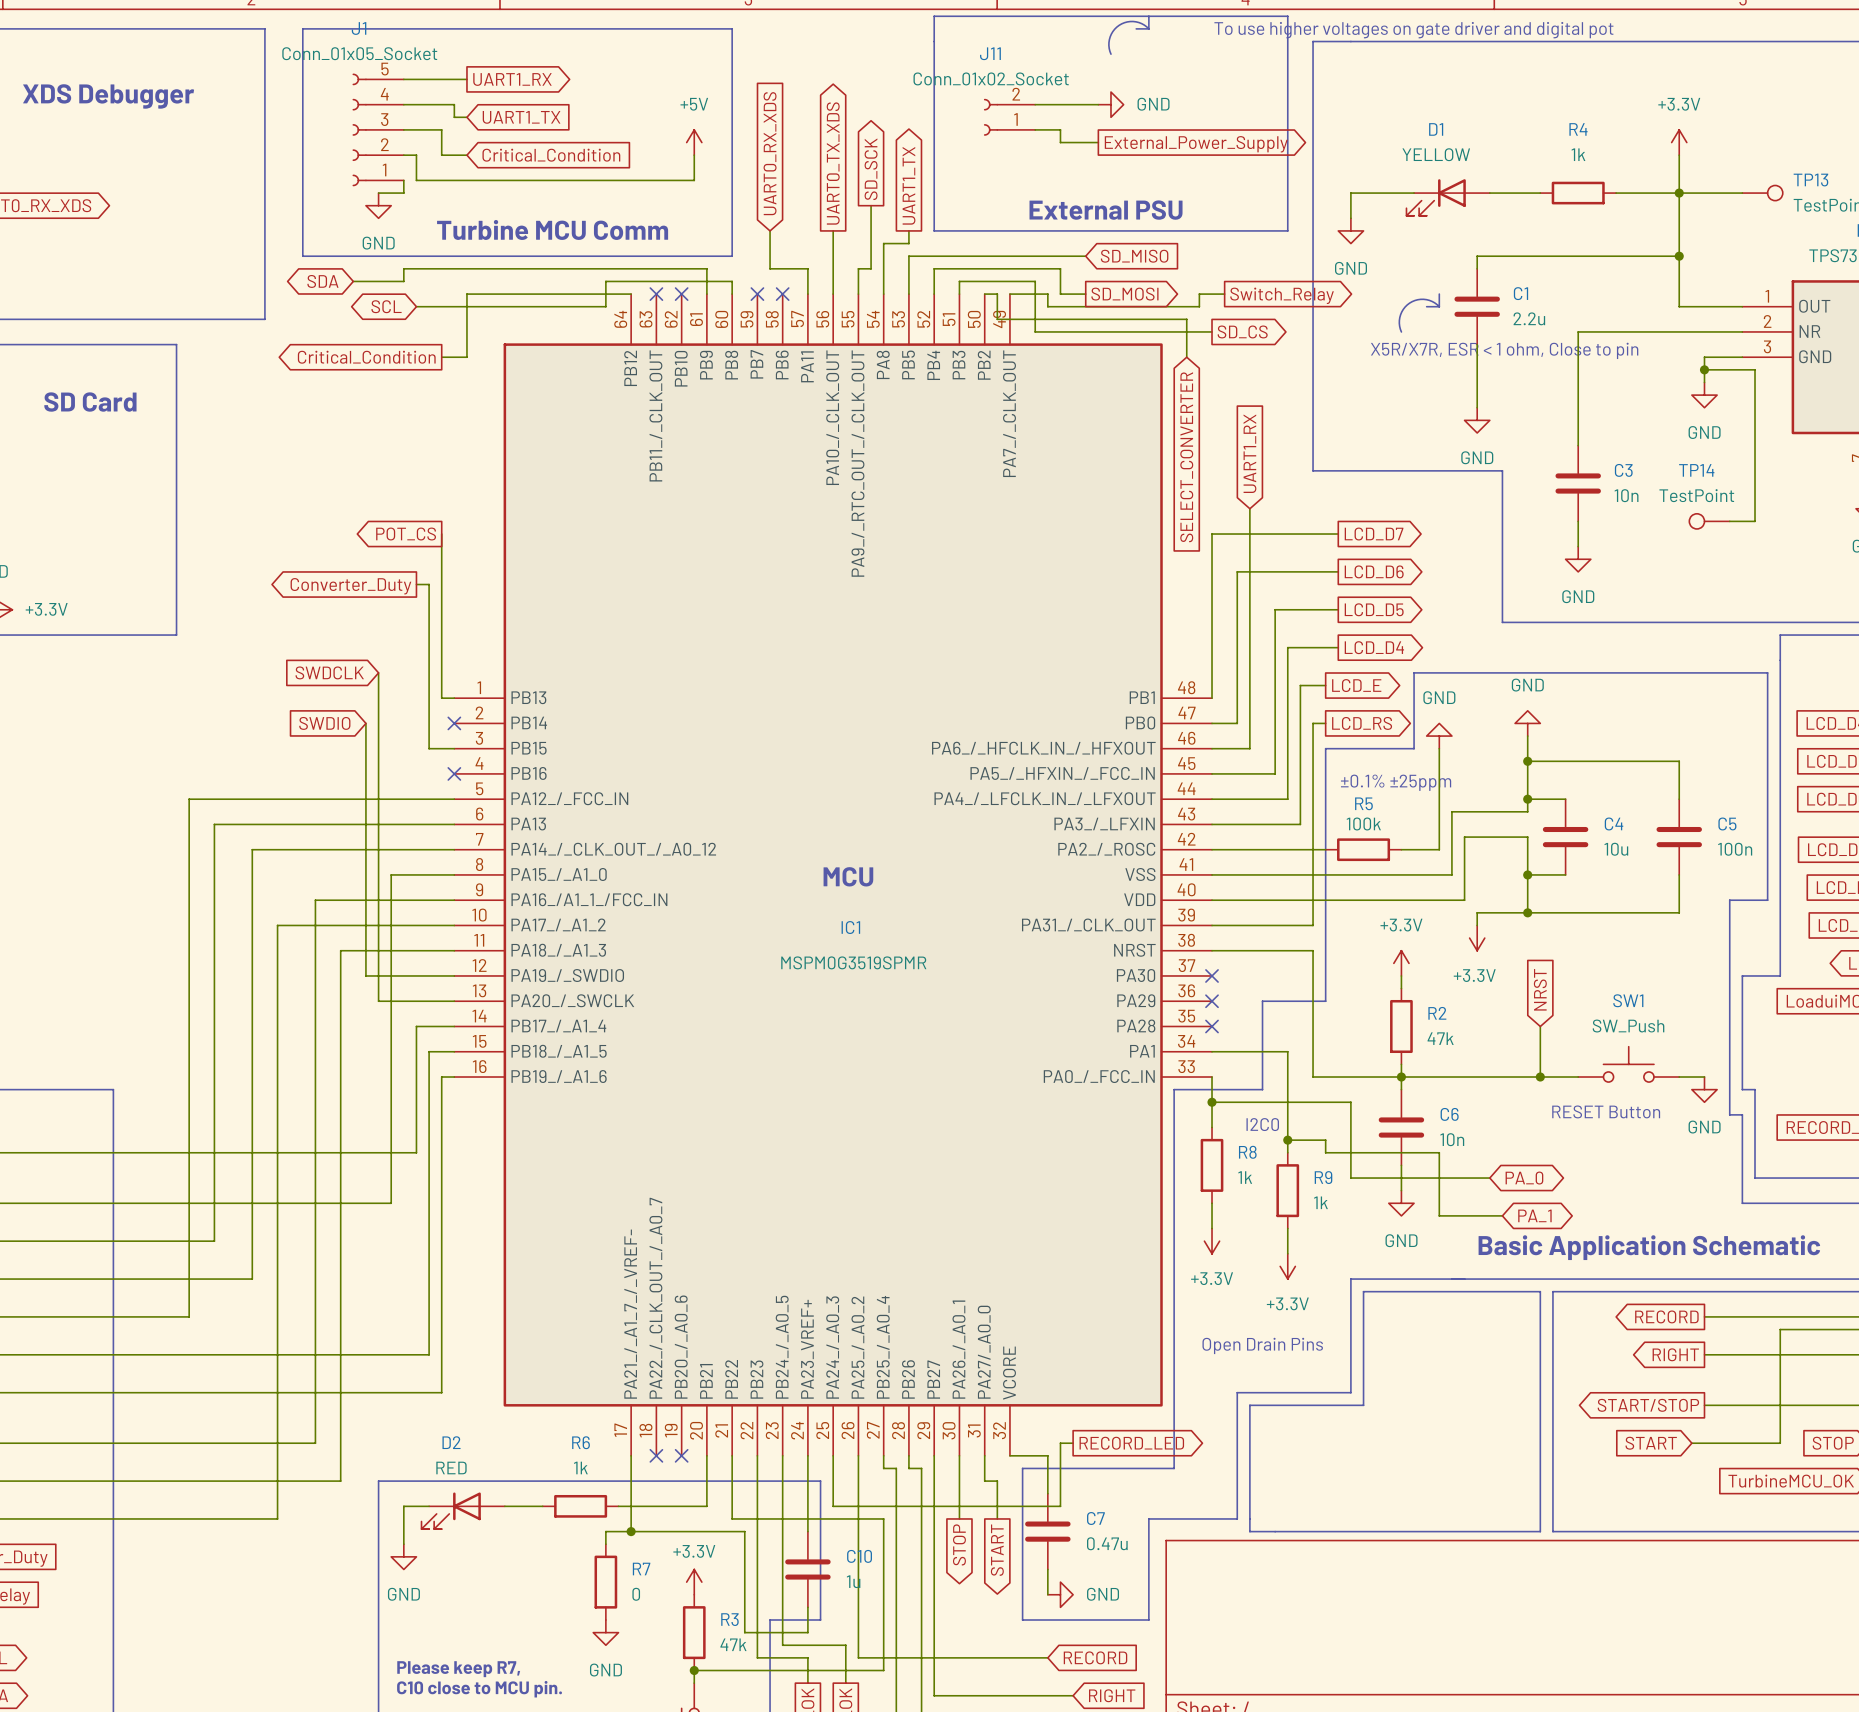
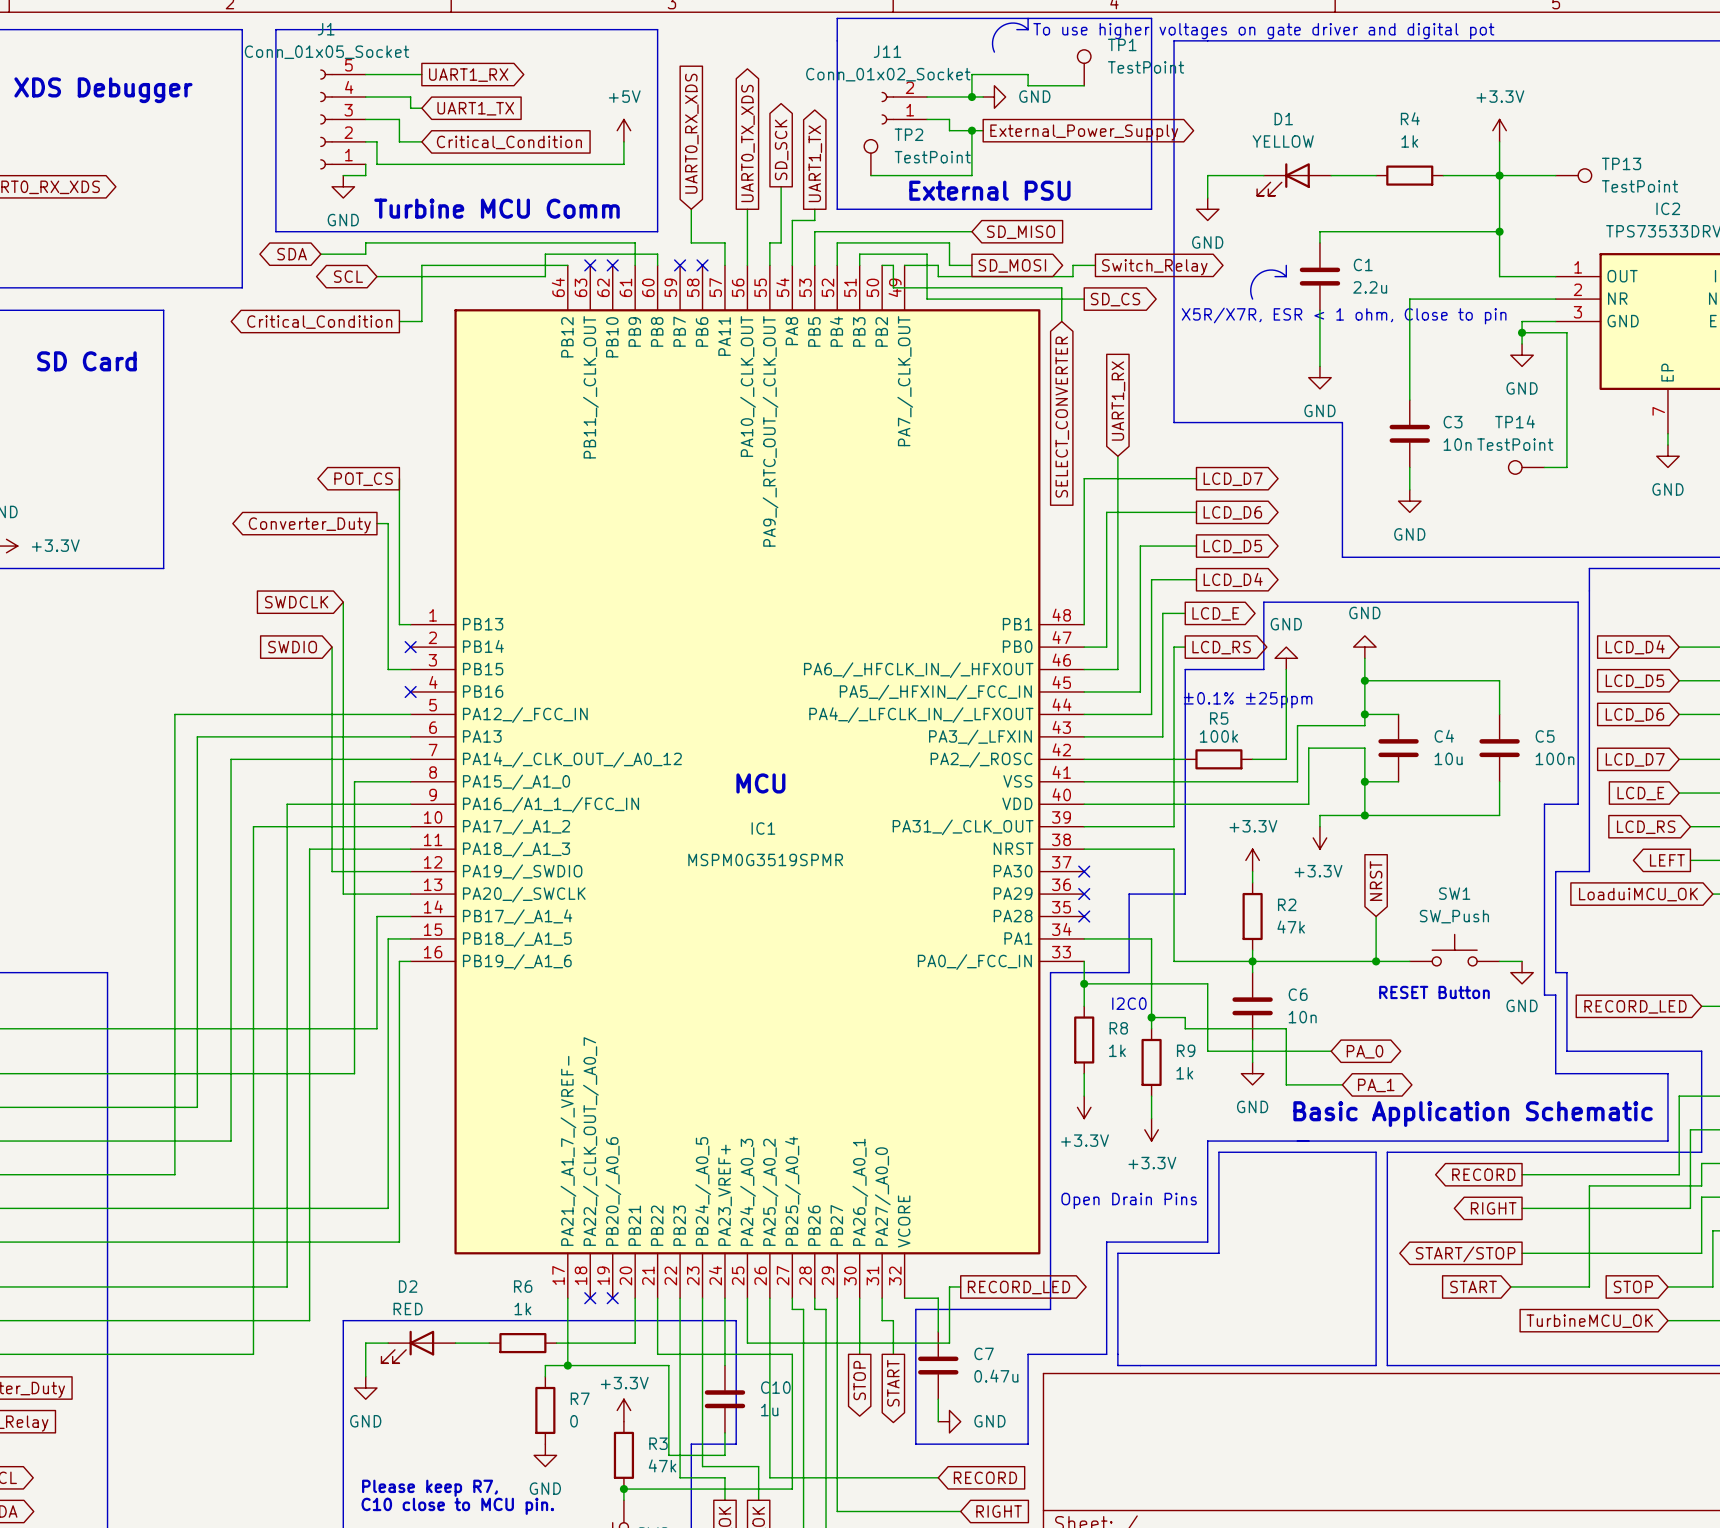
TP1: none -> TestPoint (1084, 67)
wire: none -> (1084, 85) (1028, 85) (1028, 74) (971, 74) (971, 97)
junction: none -> (971, 97)
wire: none -> (971, 130) (971, 175) (870, 175)
junction: none -> (971, 130)
TP2: none -> TestPoint (870, 157)

